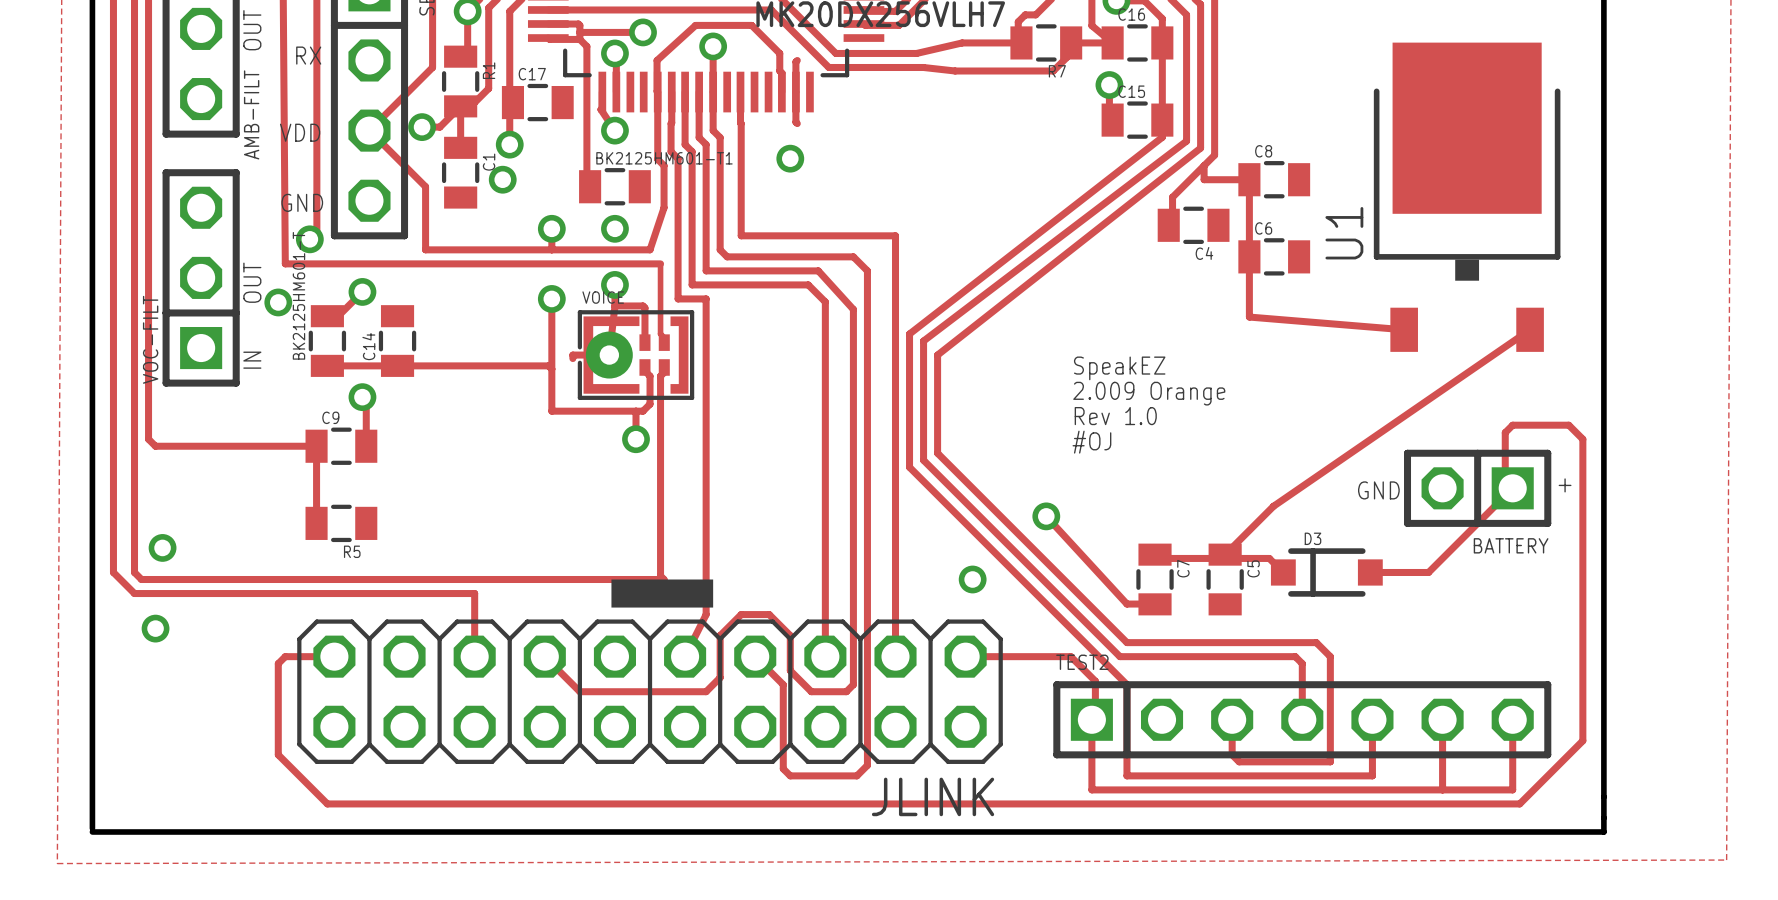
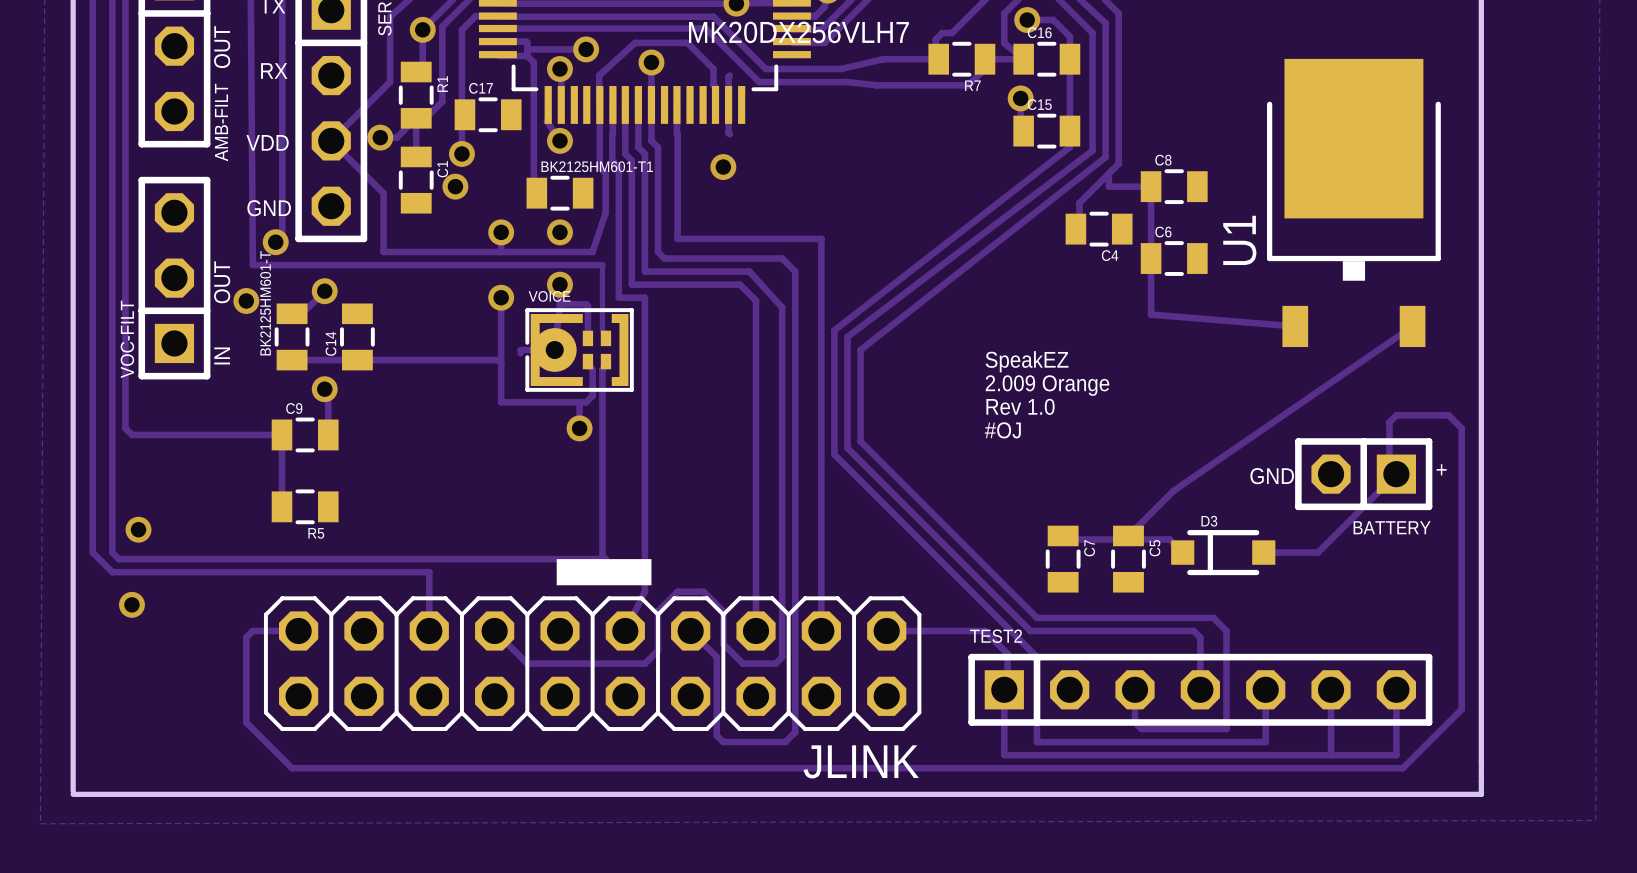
track: (1046, 516) (1126, 604) (1158, 604) -> none
via: (1046, 516) -> none
via: (972, 579) -> none

